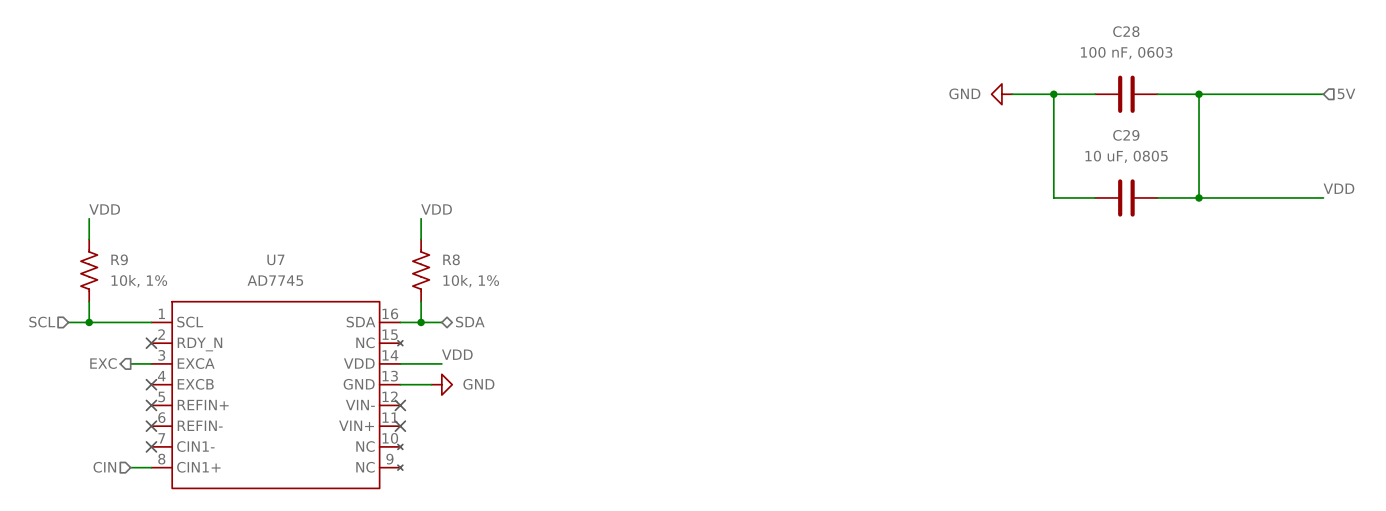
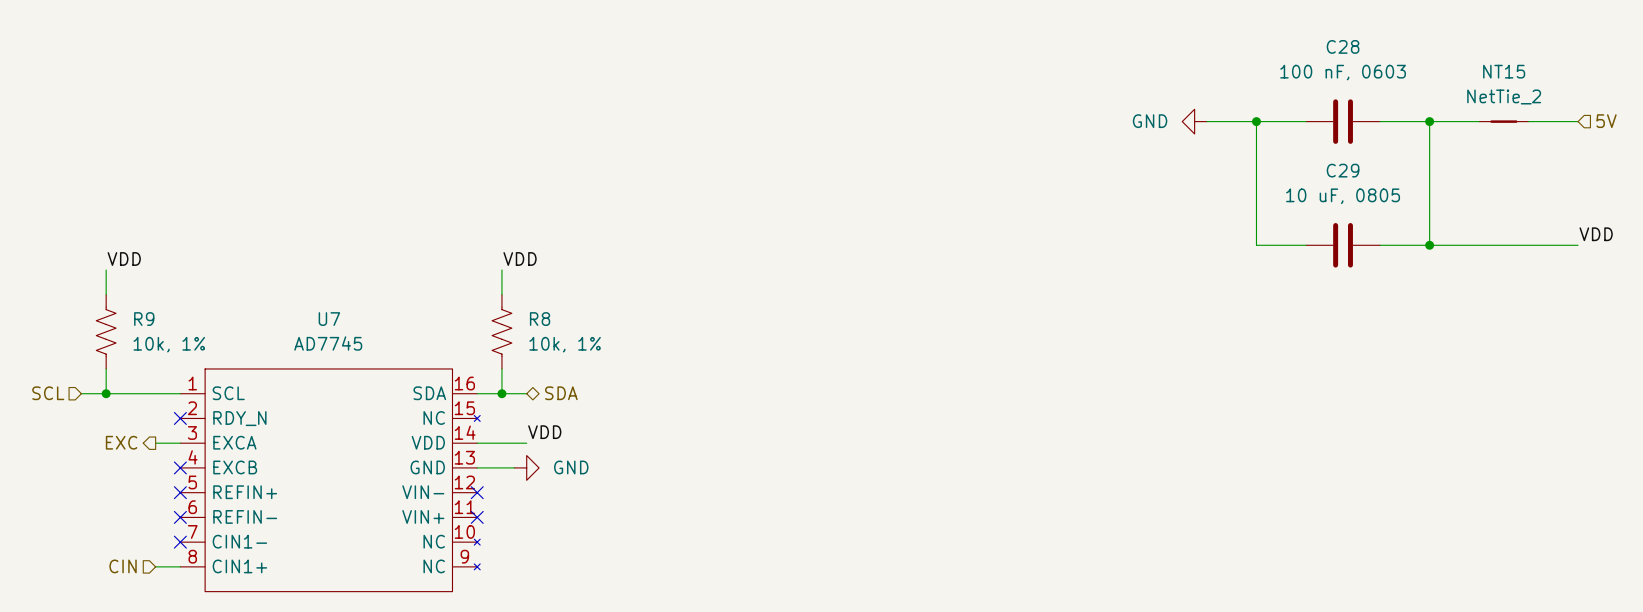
NT15: none -> NetTie_2 (1503, 121)

